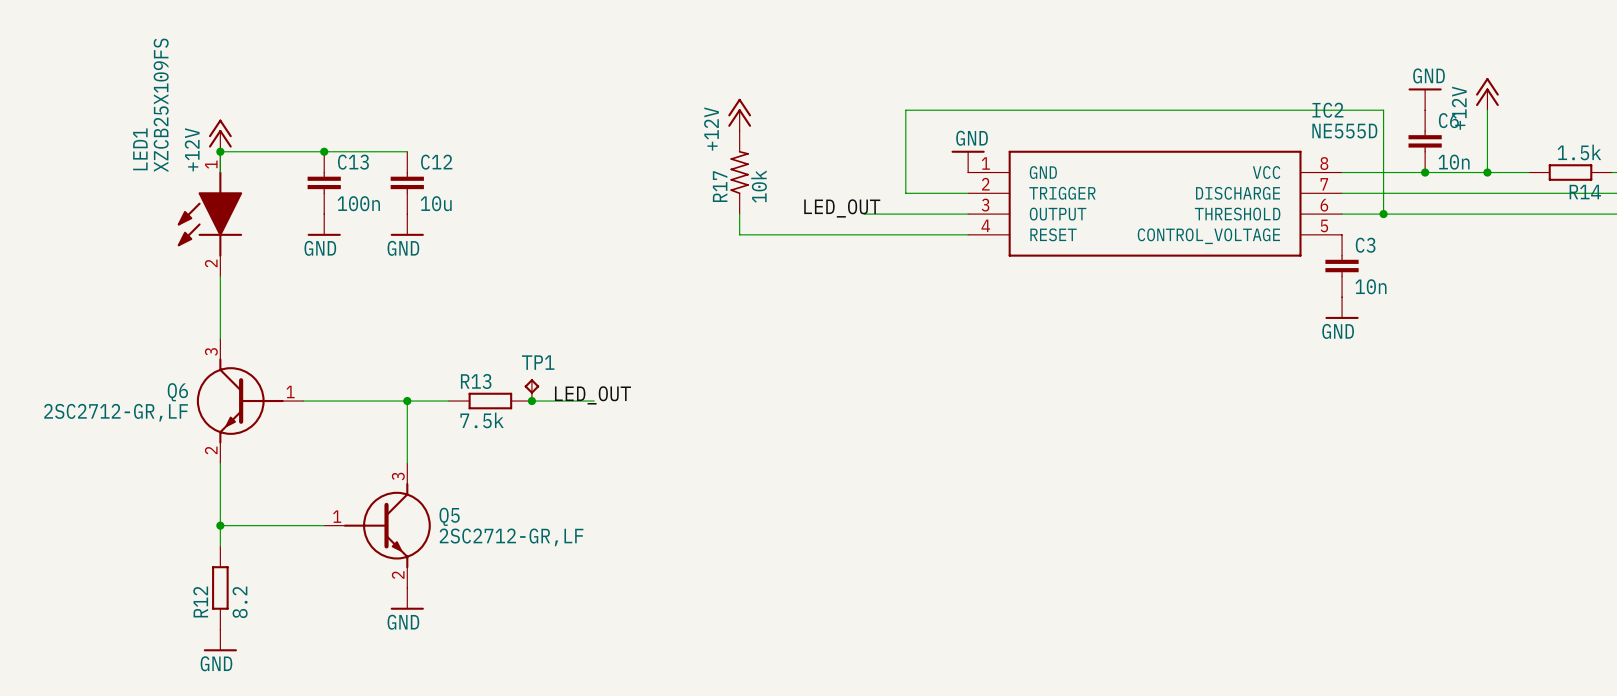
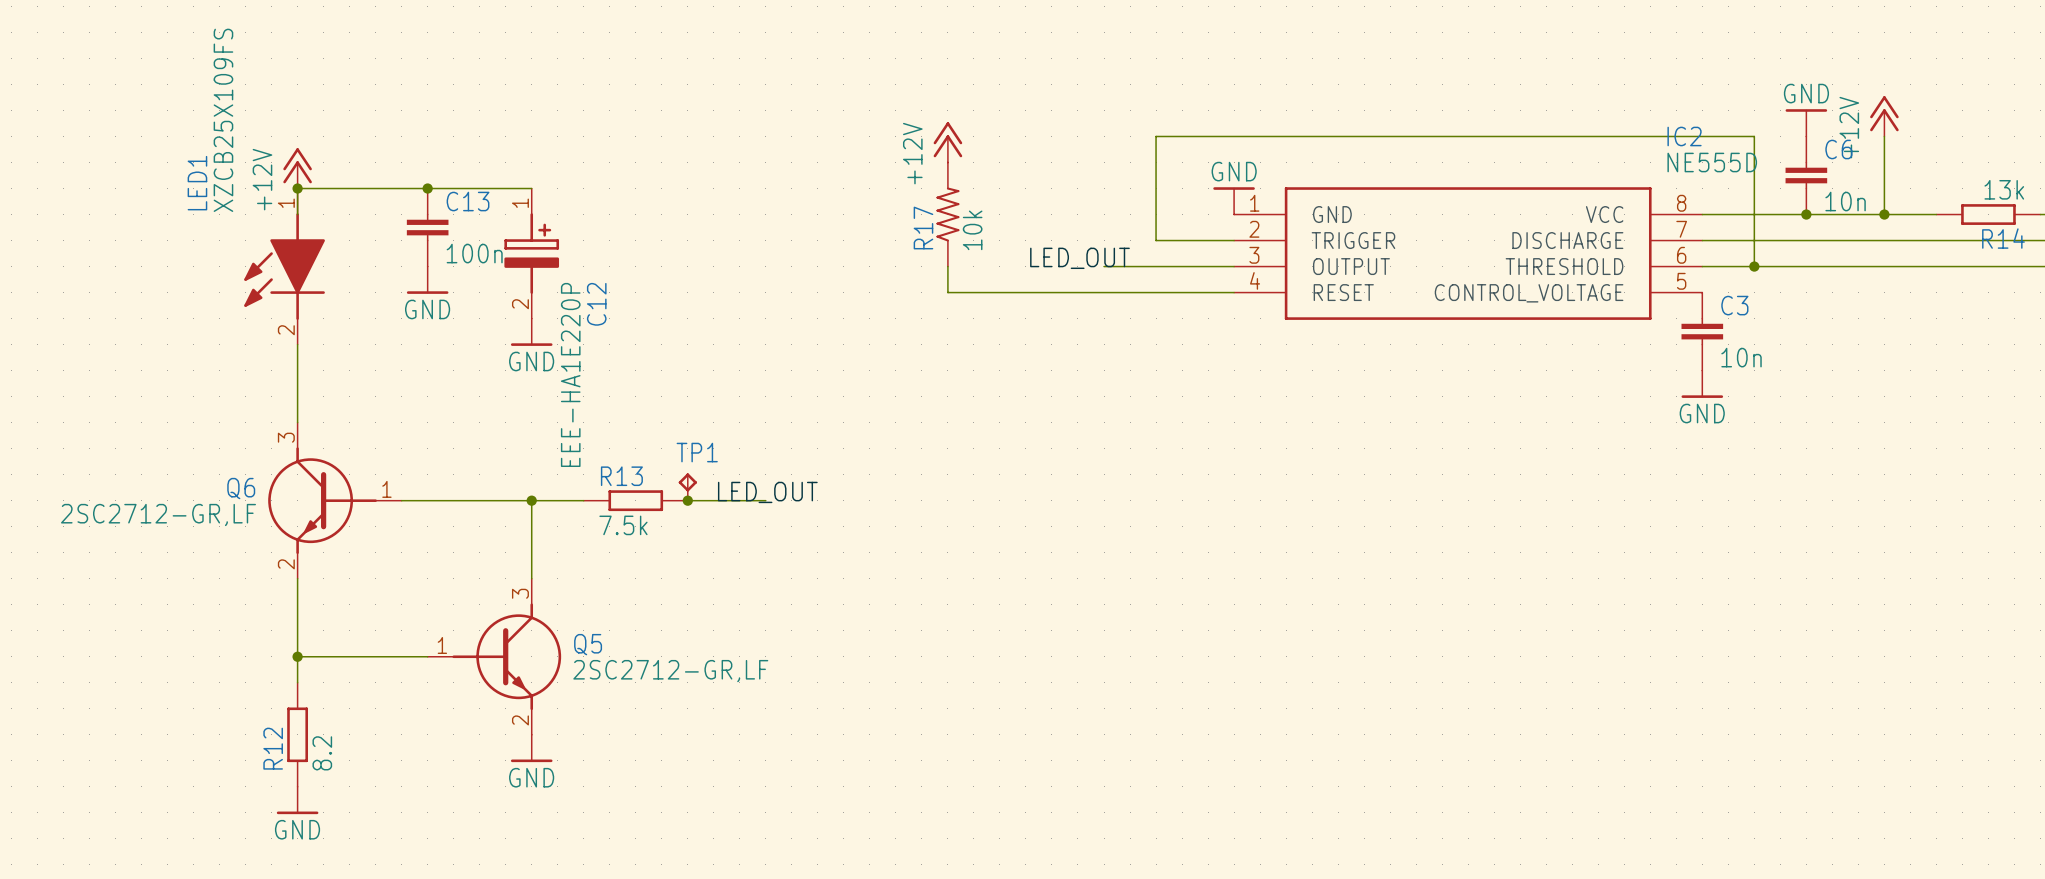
C12 symbol: [390, 151, 424, 215] -> [504, 188, 560, 319]
R14 value: 1.5k (1579, 152) -> 13k (2004, 189)
C12 name position: C12 (436, 162) -> C12 (596, 304)
C12 value: 10u (436, 203) -> EEE-HA1E220P (570, 374)
power symbol position: GND (407, 224) -> GND (531, 332)

